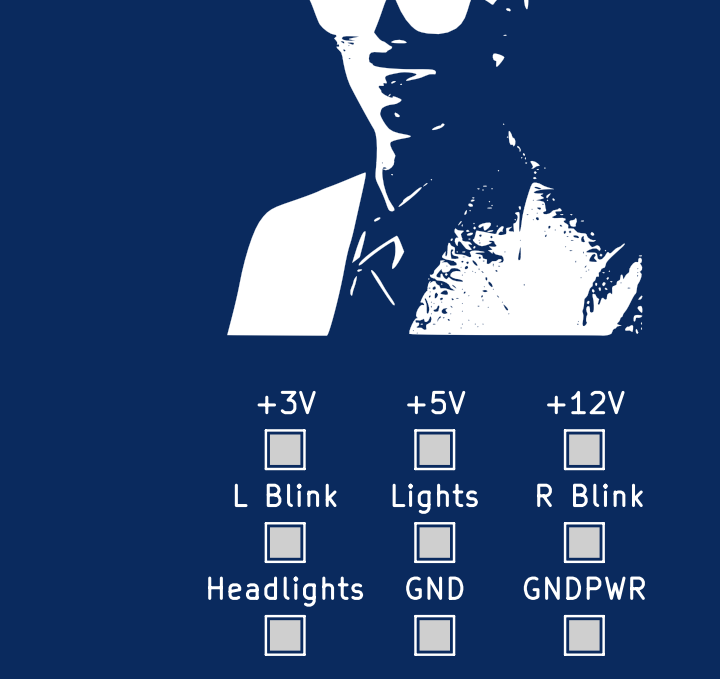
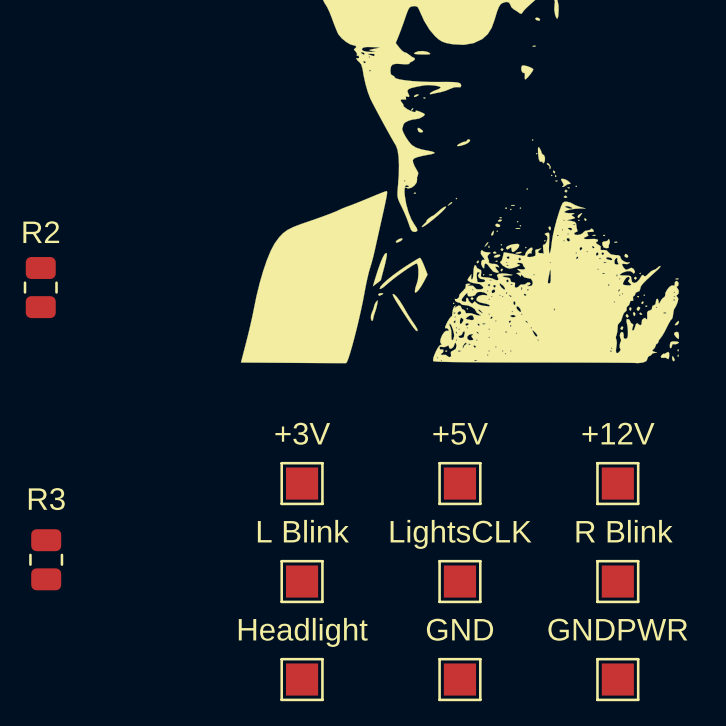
R2: none -> (40, 287)
Lights name: Lights (435, 498) -> LightsCLK (461, 534)
R3: none -> (46, 559)
Headlights name: Headlights (285, 591) -> Headlight (303, 632)

